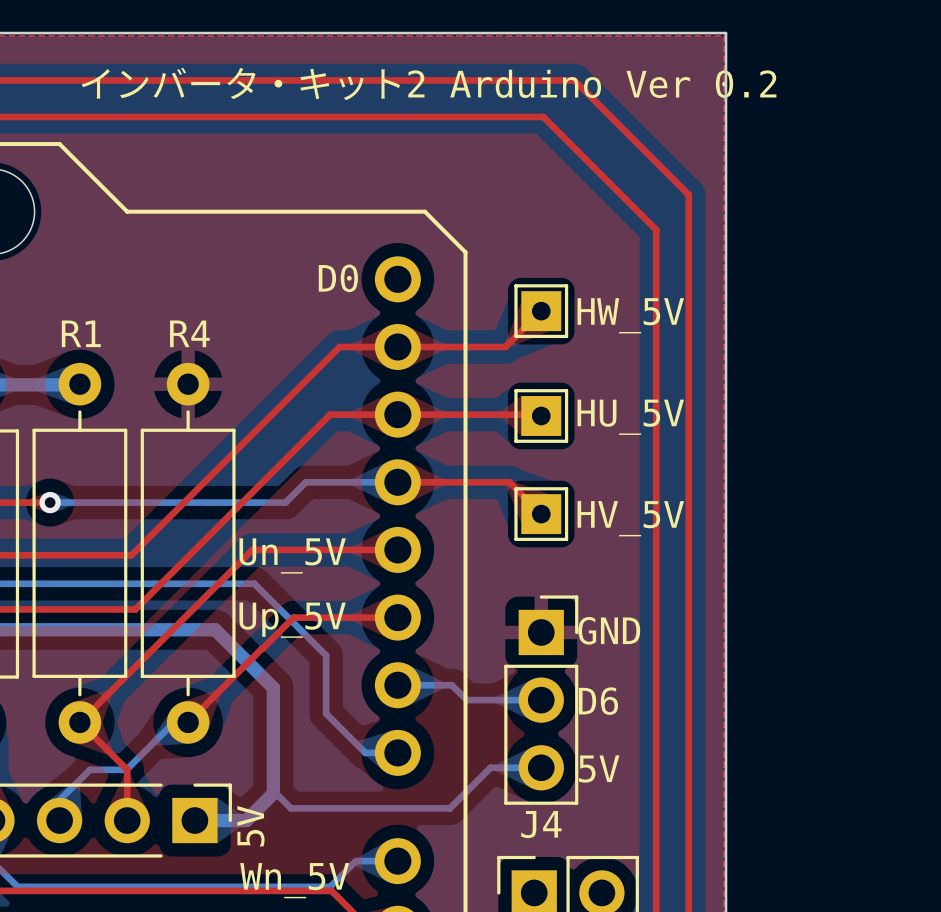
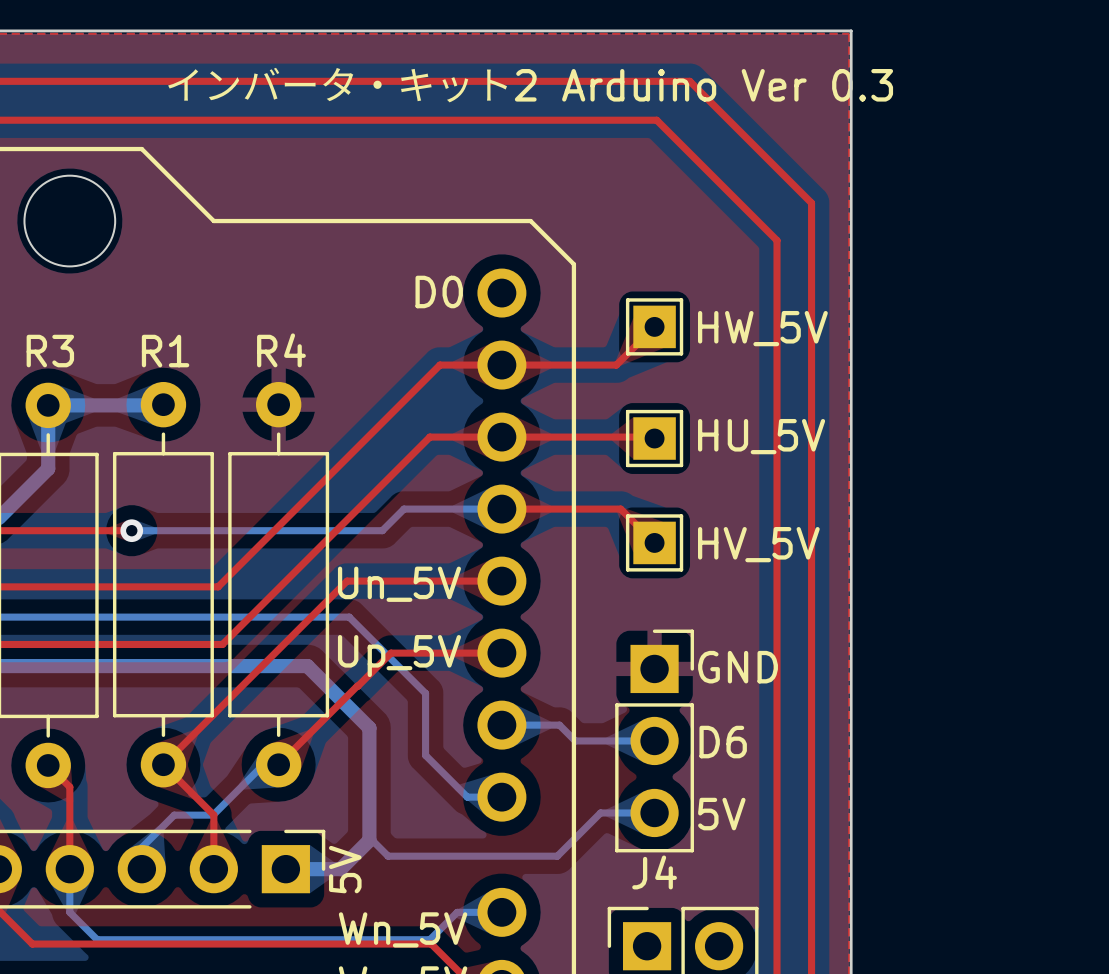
text: インバータ・キット2 Arduino Ver 0.2 (429, 83) -> インバータ・キット2 Arduino Ver 0.3 (529, 85)

